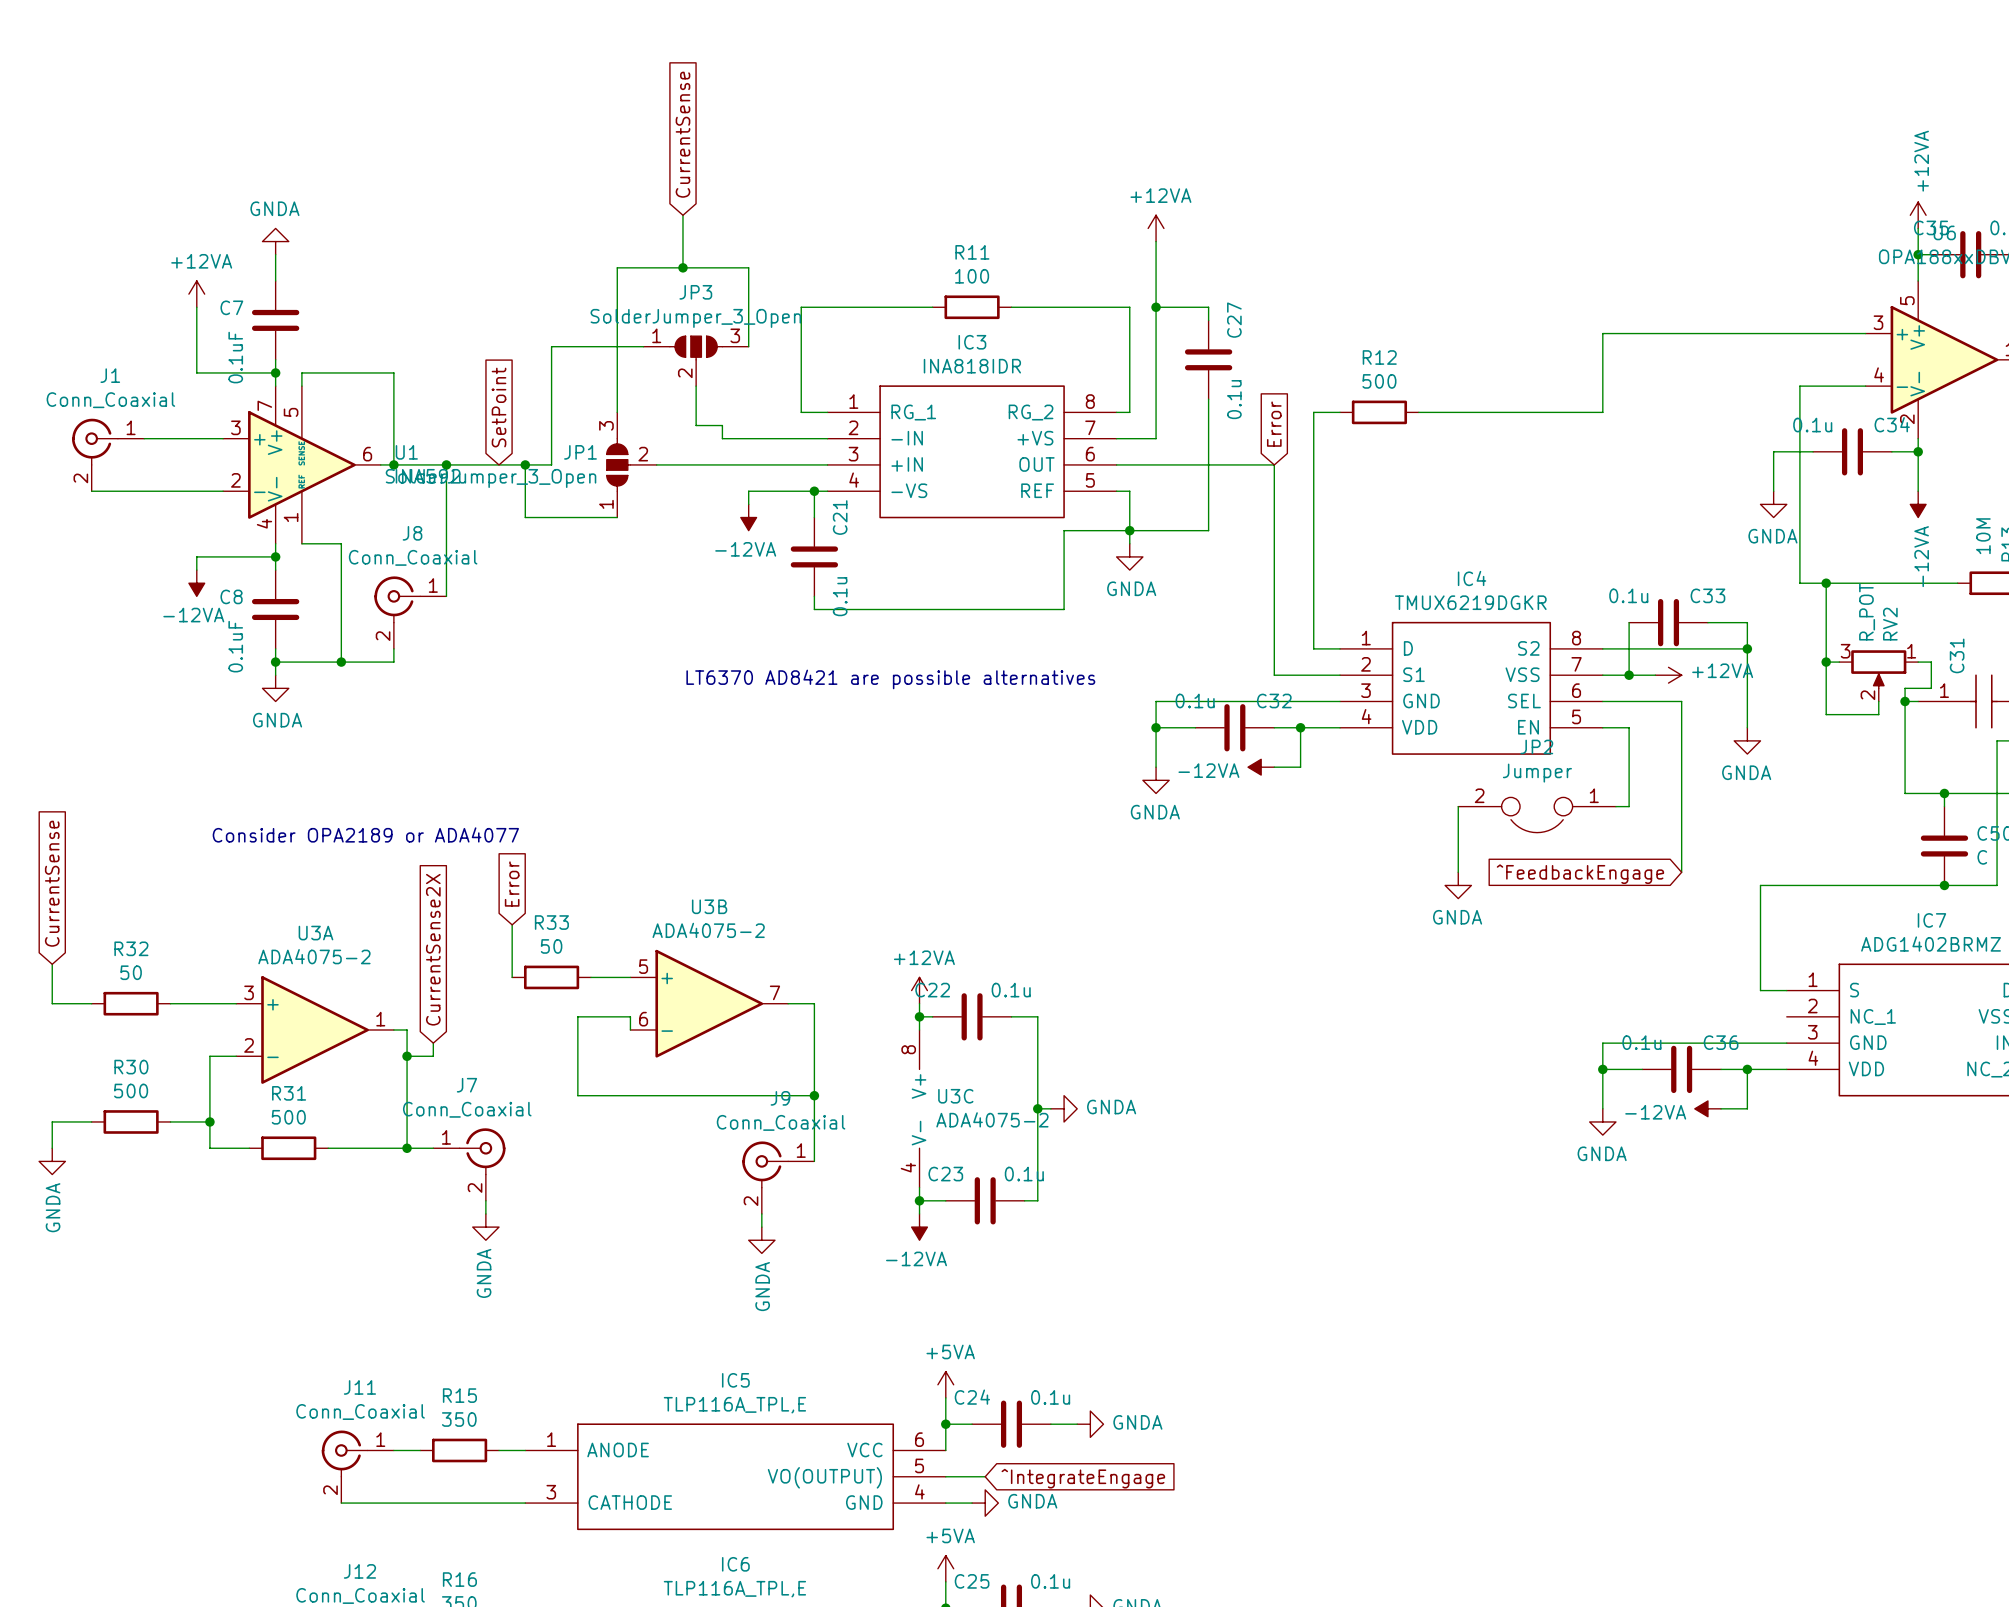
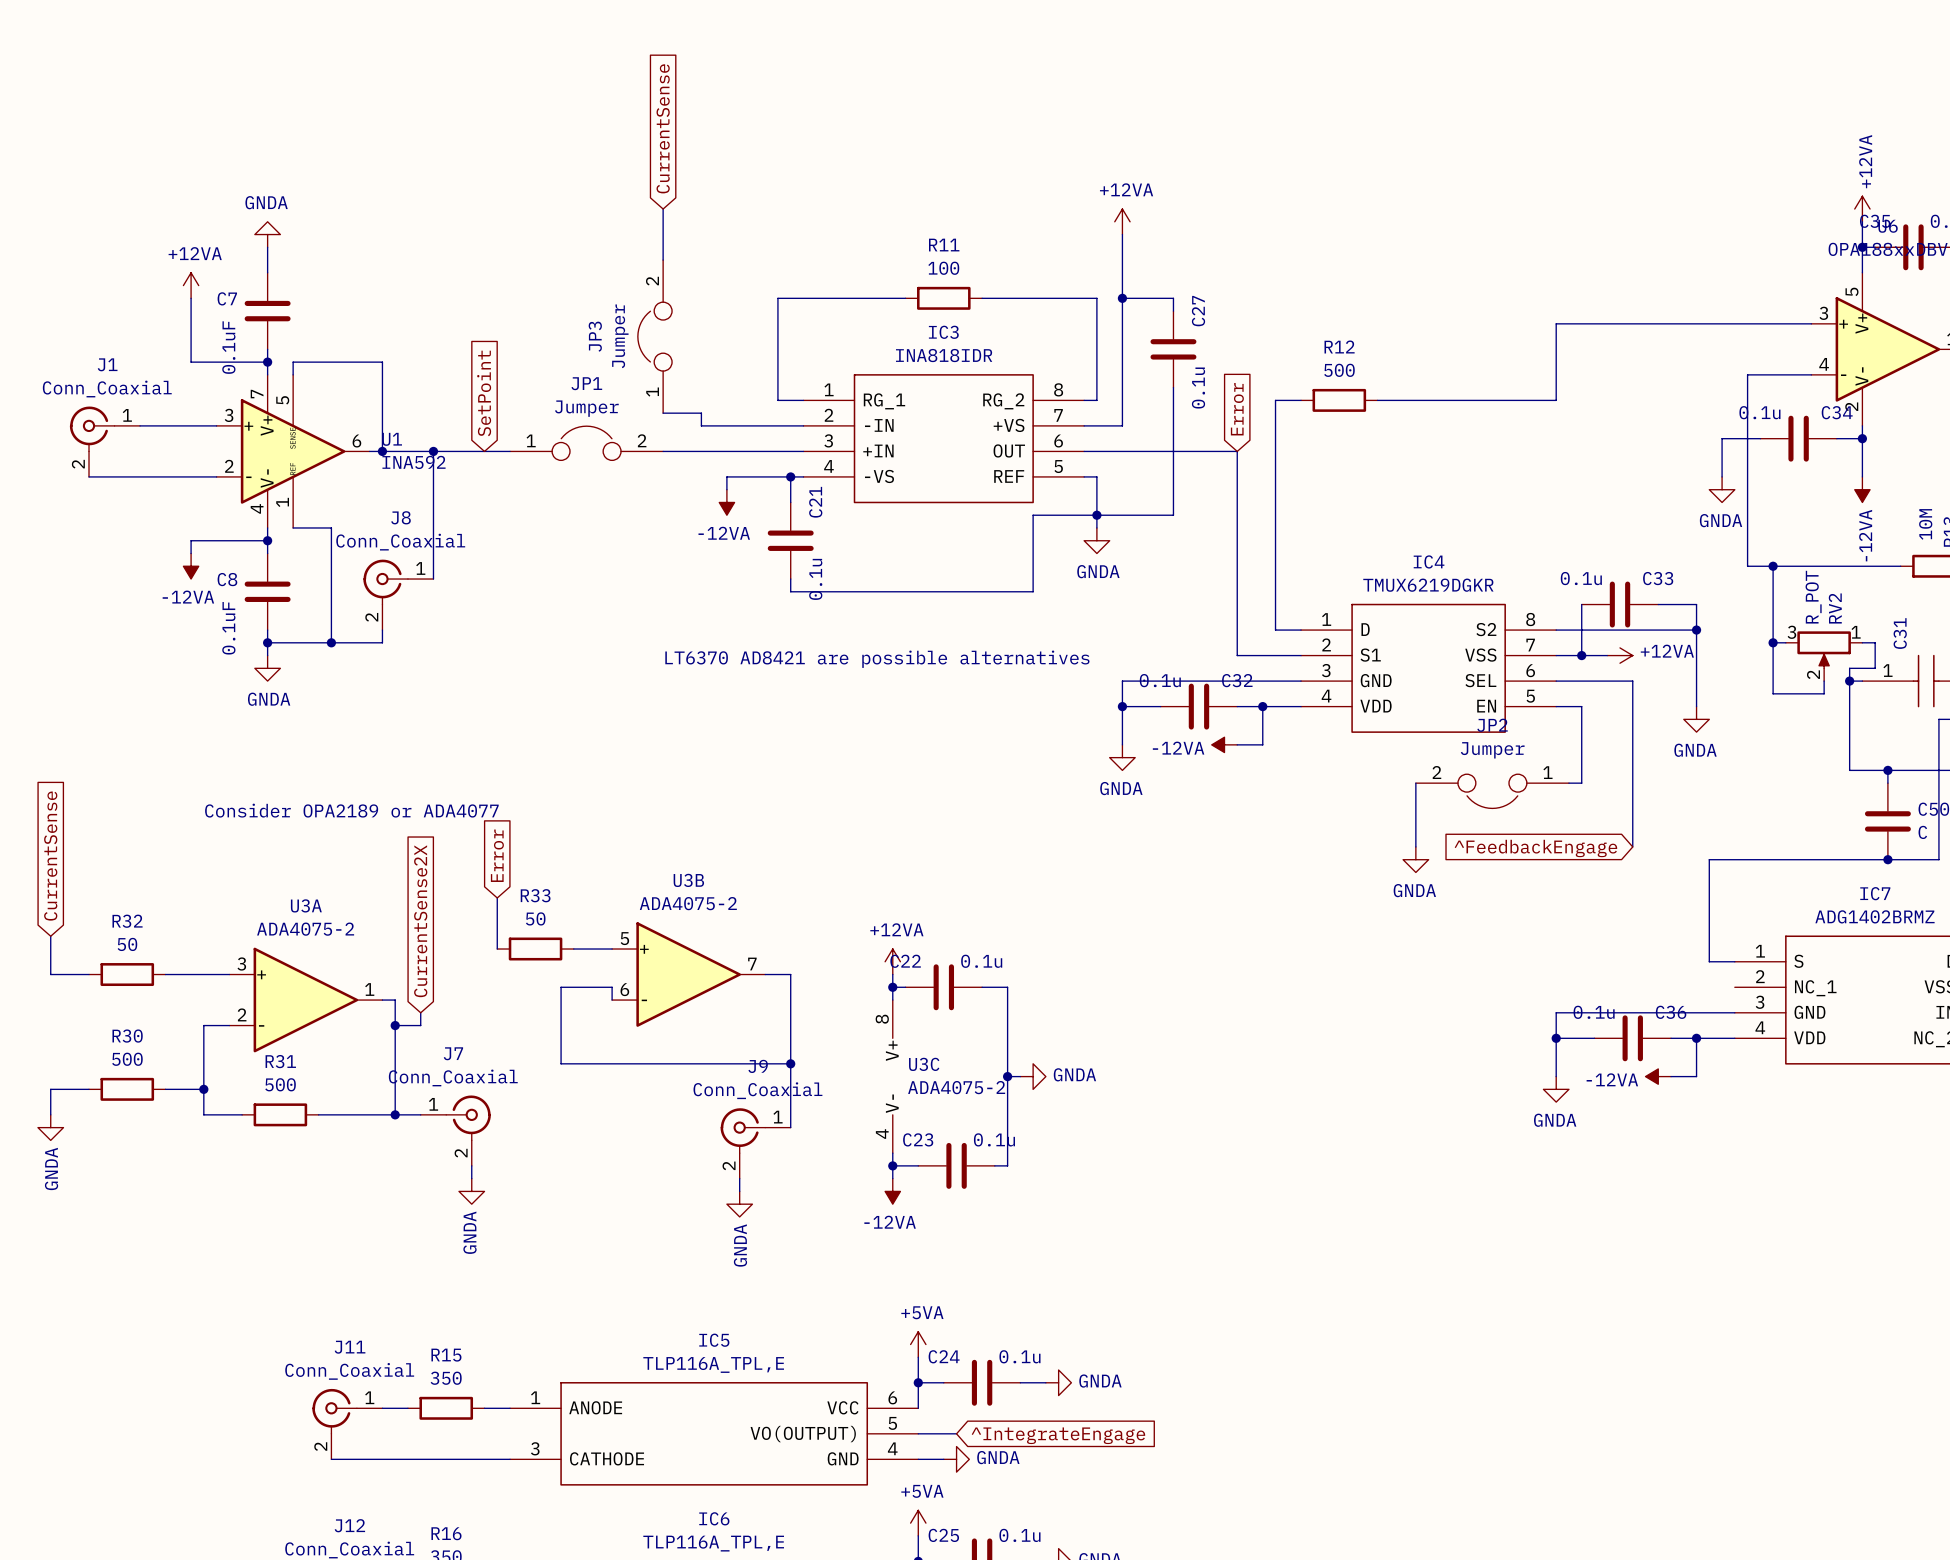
junction: (682, 267) -> none
JP3 name position: JP3 (695, 292) -> JP3 (595, 336)
JP3 value: SolderJumper_3_Open (695, 318) -> Jumper (620, 336)
JP3 symbol: [643, 336, 749, 387] -> [637, 260, 673, 414]
wire: (643, 346) (551, 346) (551, 464) (525, 464) (525, 517) (617, 517) -> none
wire: (748, 346) (748, 267) (617, 267) (617, 412) -> none
wire: (696, 386) (696, 425) -> (663, 413) (675, 413)
JP1 symbol: [606, 412, 657, 518] -> [510, 426, 664, 461]
JP1 name position: JP1 (580, 452) -> JP1 (586, 383)
junction: (525, 464) -> none
JP1 value: SolderJumper_3_Open (491, 478) -> Jumper (586, 408)

